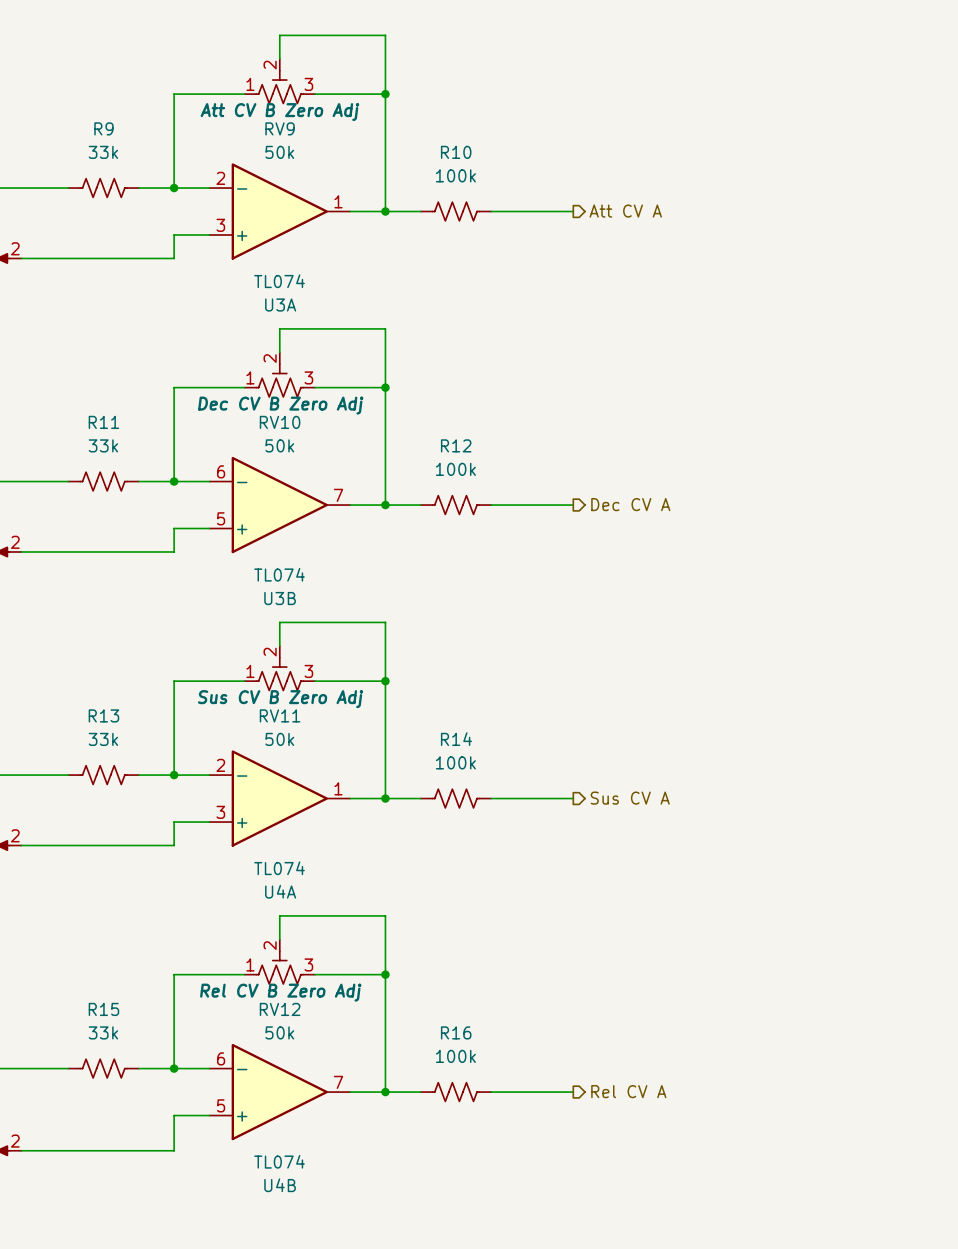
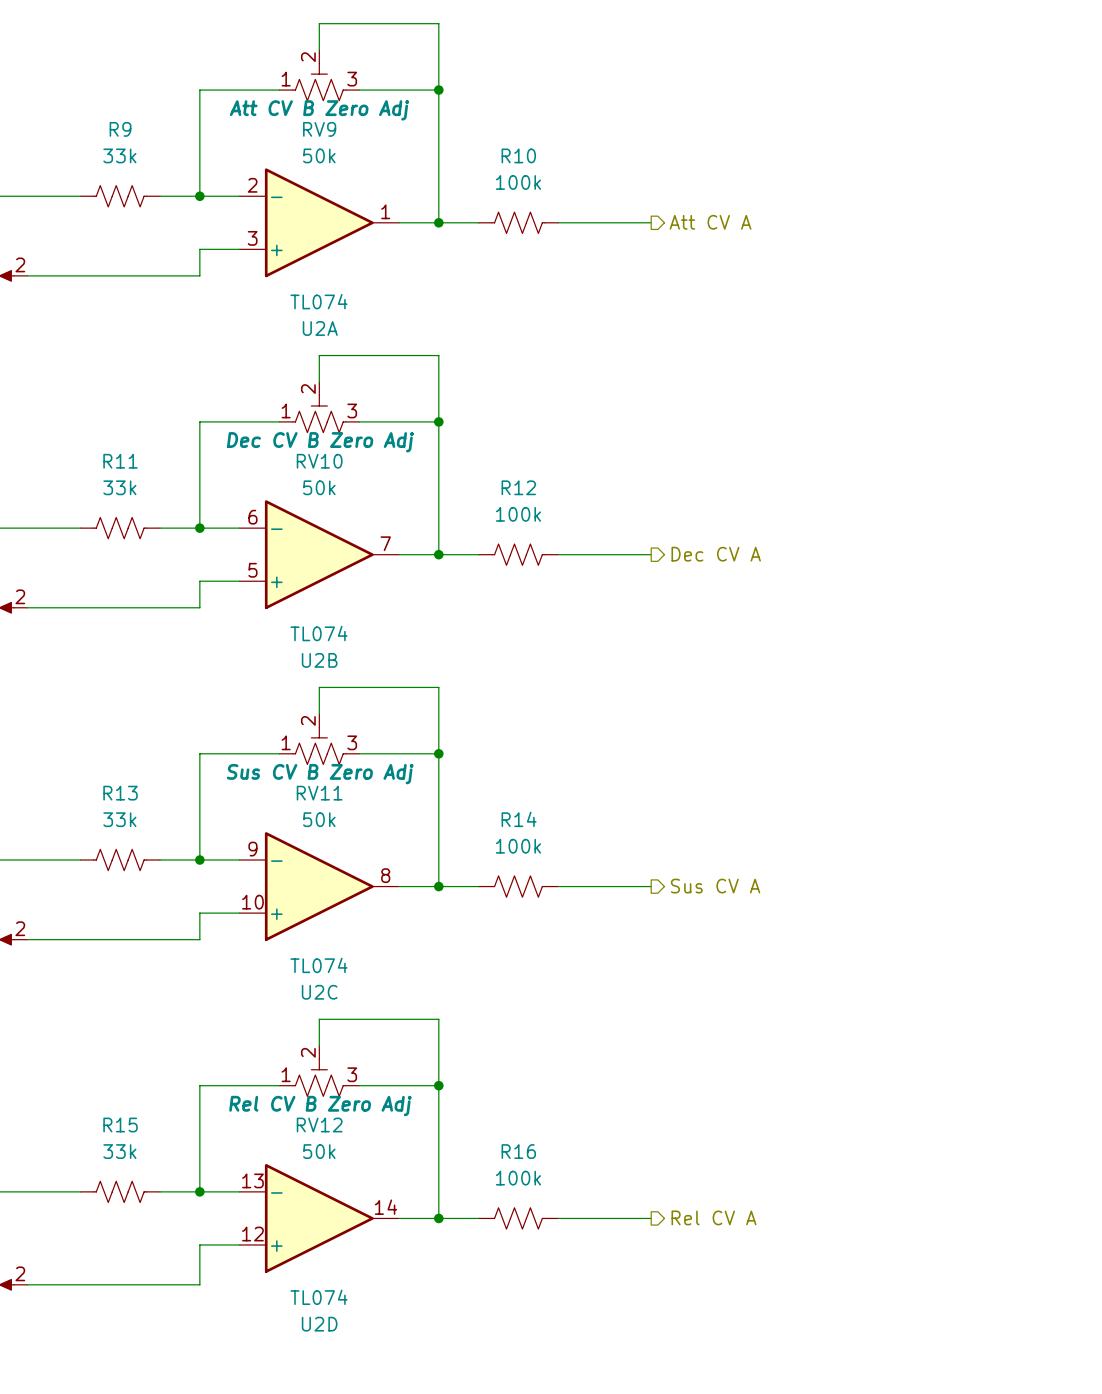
U3A name: U3A (280, 305) -> U2A (320, 328)
U3B name: U3B (280, 598) -> U2B (319, 660)
U4A pin number: 2 (220, 765) -> 9 (252, 849)
U4A pin number: 1 (338, 788) -> 8 (385, 875)
U4A pin number: 3 (220, 812) -> 10 (252, 902)
U4A name: U4A (280, 891) -> U2C (319, 992)
U4B pin number: 6 (221, 1058) -> 13 (252, 1180)
U4B pin number: 7 (338, 1082) -> 14 (386, 1207)
U4B pin number: 5 (221, 1105) -> 12 (252, 1234)
U4B name: U4B (280, 1185) -> U2D (319, 1324)

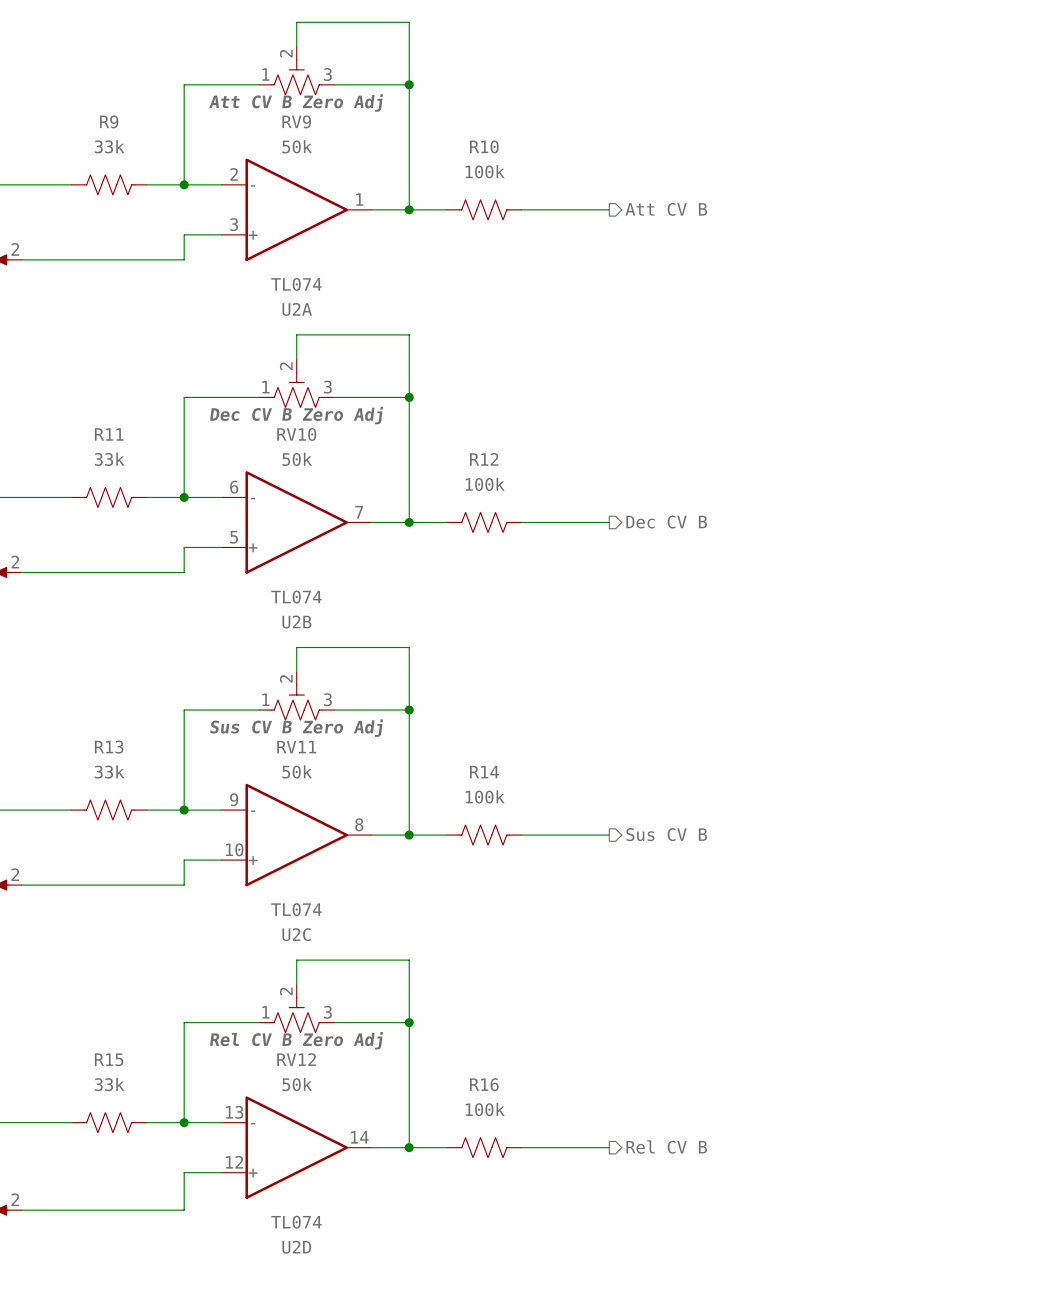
hierarchical label: Att CV A (710, 222) -> Att CV B (666, 209)
hierarchical label: Dec CV A (716, 554) -> Dec CV B (666, 522)
hierarchical label: Sus CV A (715, 886) -> Sus CV B (666, 834)
hierarchical label: Rel CV A (714, 1217) -> Rel CV B (666, 1147)

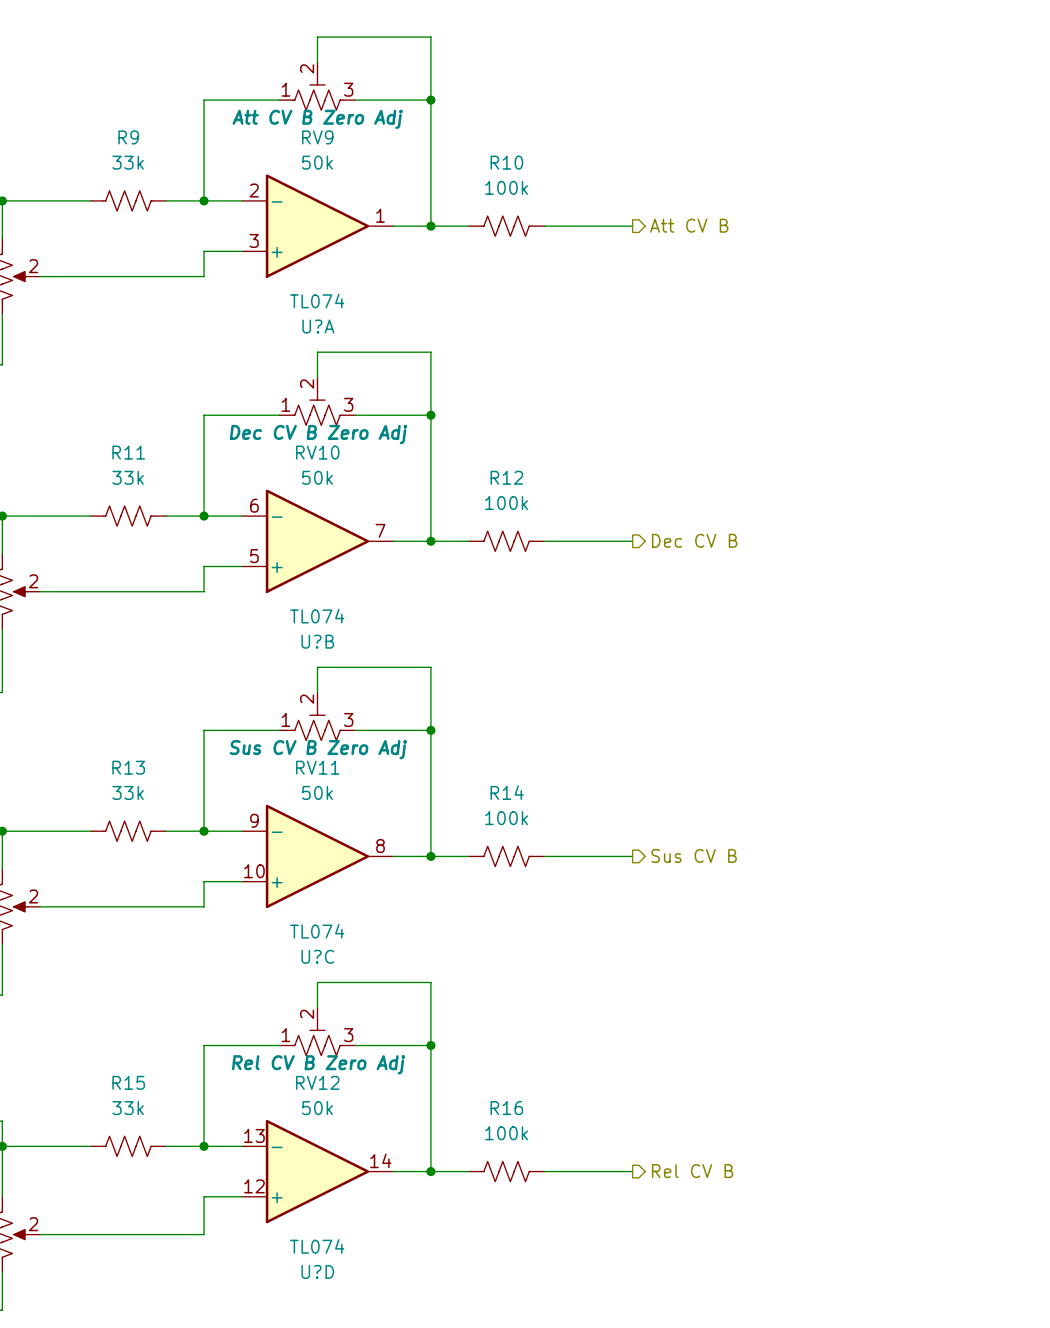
U2A name: U2A (297, 309) -> U?A (318, 326)
U2B name: U2B (296, 622) -> U?B (317, 641)
U2C name: U2C (296, 934) -> U?C (317, 956)
U2D name: U2D (296, 1247) -> U?D (317, 1271)

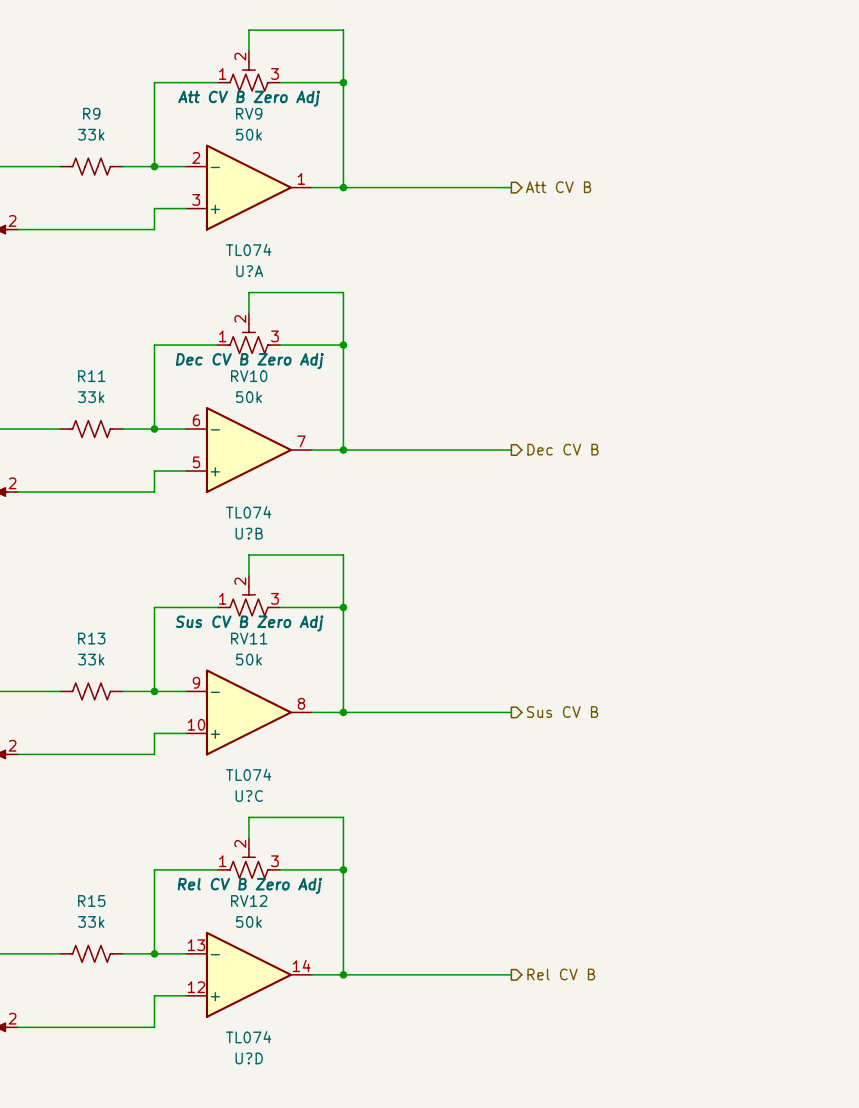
R10: 100k (506, 226) -> none
R12: 100k (506, 541) -> none
R14: 100k (506, 856) -> none
R16: 100k (506, 1171) -> none

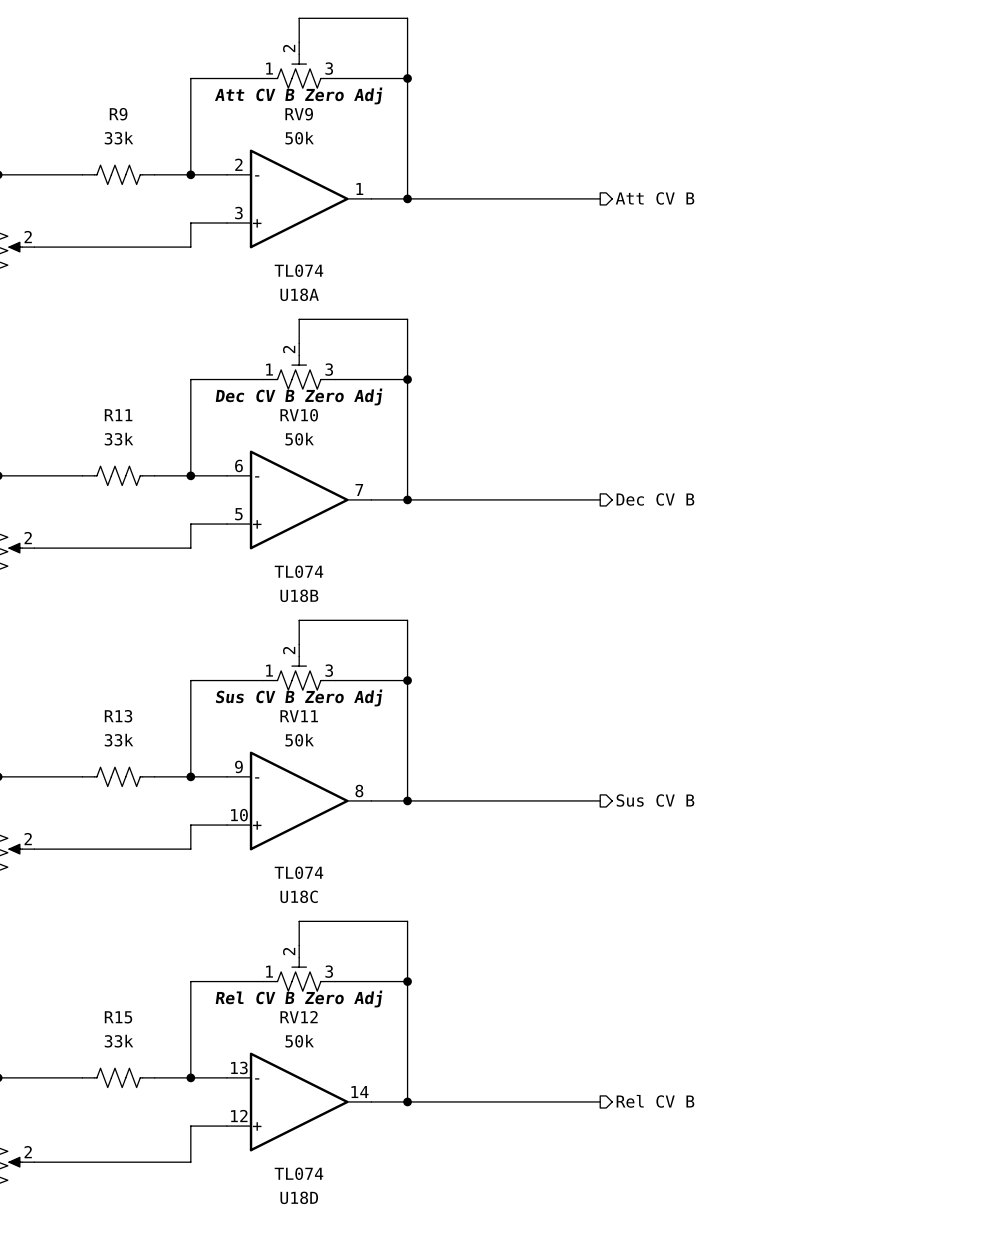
U?A name: U?A (249, 271) -> U18A (299, 294)
U?B name: U?B (249, 533) -> U18B (299, 595)
U?C name: U?C (249, 796) -> U18C (299, 896)
U?D name: U?D (249, 1058) -> U18D (299, 1197)

